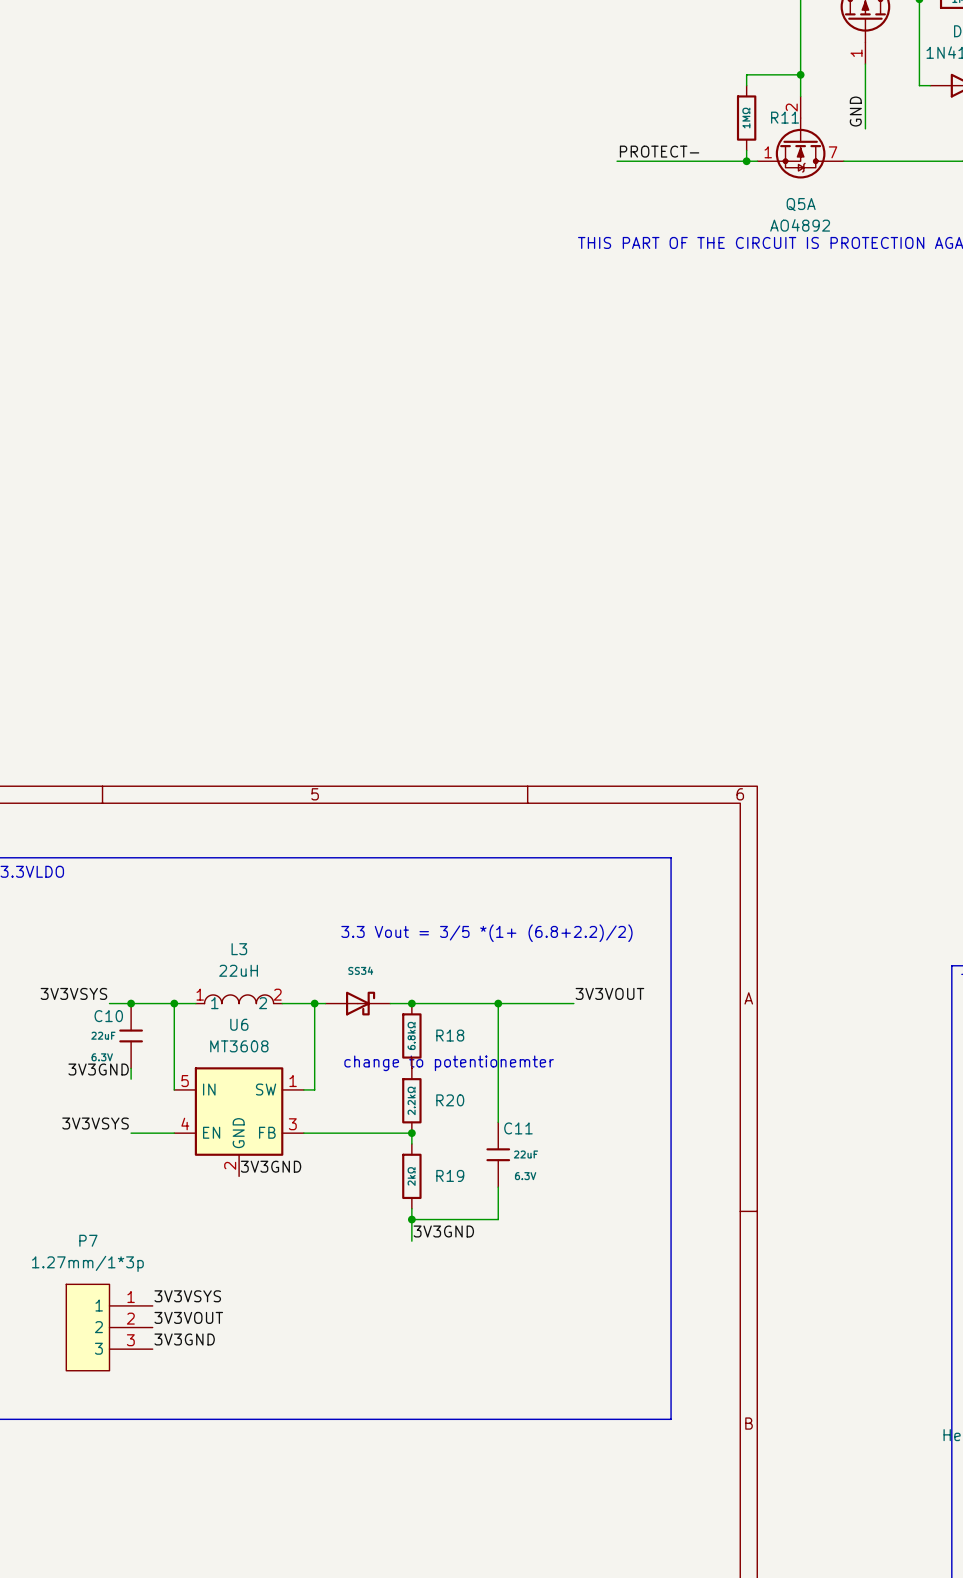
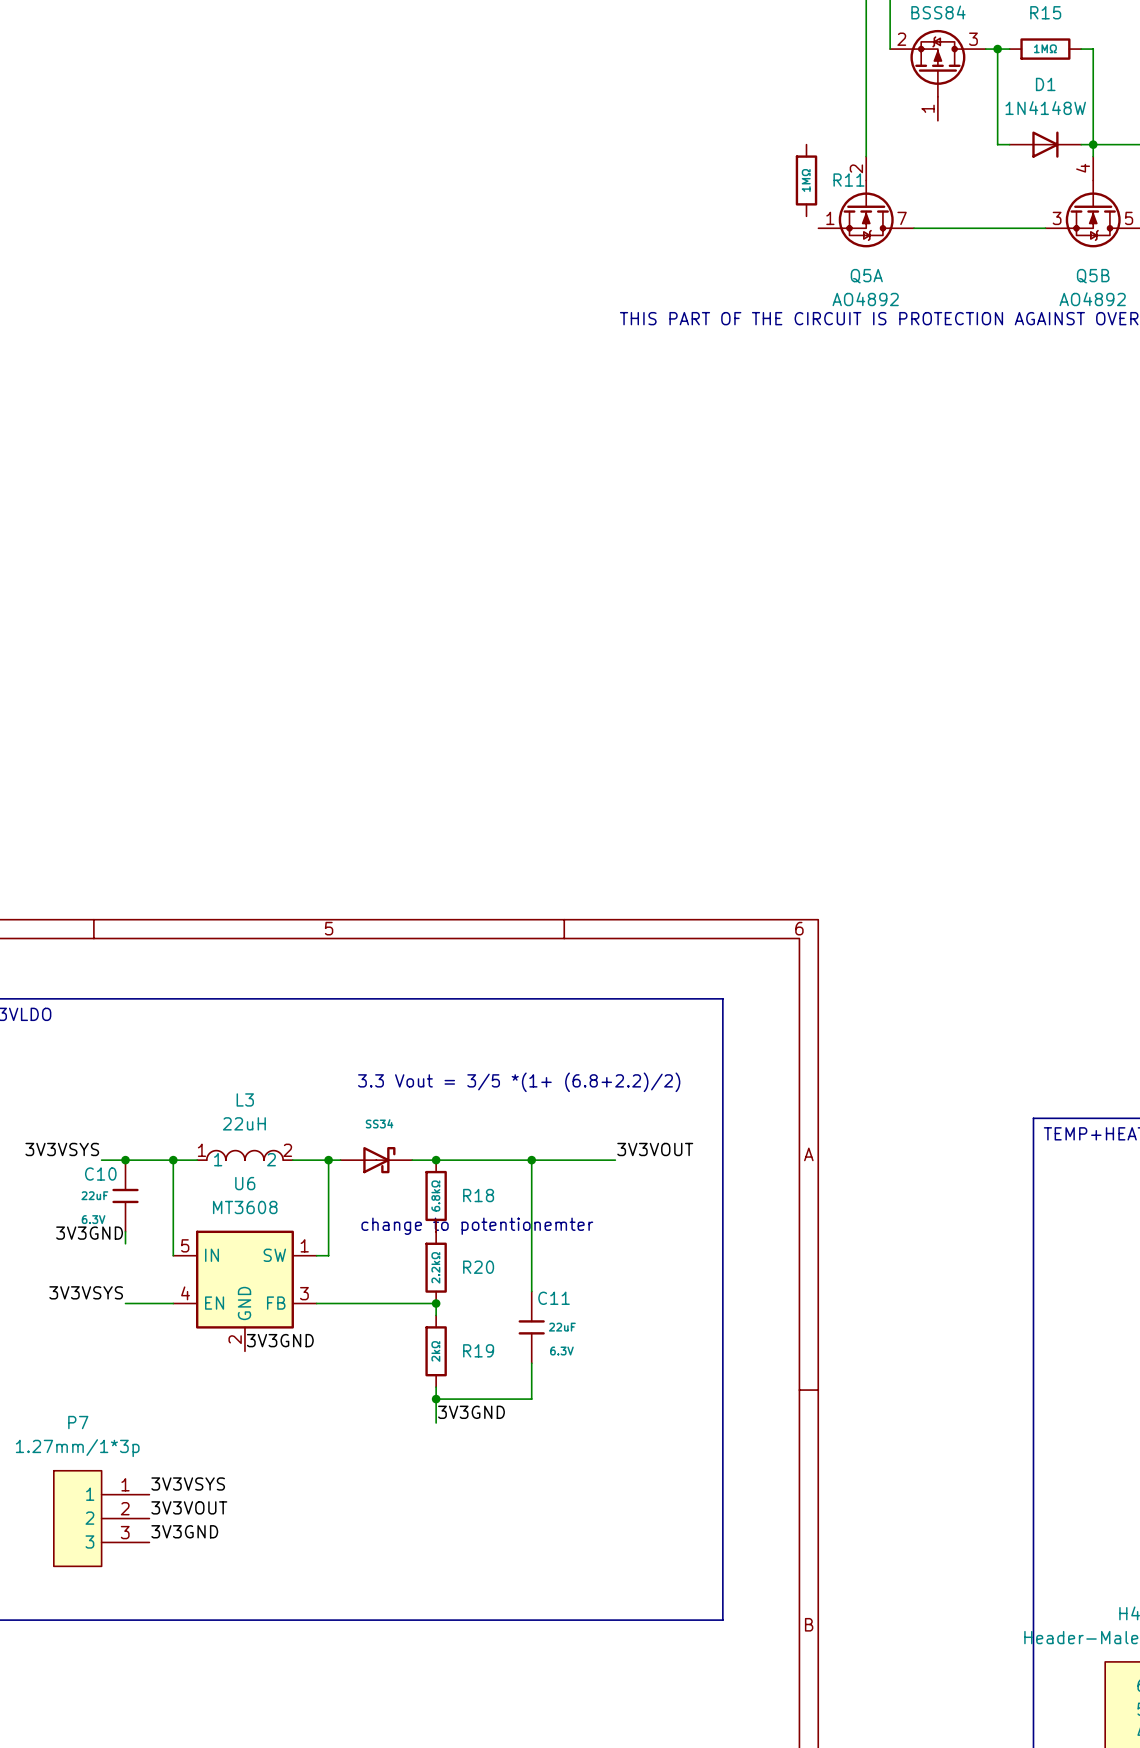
wire: (865, 64) (865, 128) -> none
wire: (800, 74) (746, 74) (746, 85) -> none
junction: (800, 74) -> none
label: GND (855, 111) -> none
wire: (746, 150) (746, 161) -> none
label: PROTECT- (659, 151) -> none
wire: (617, 161) (757, 161) -> none
junction: (746, 161) -> none

